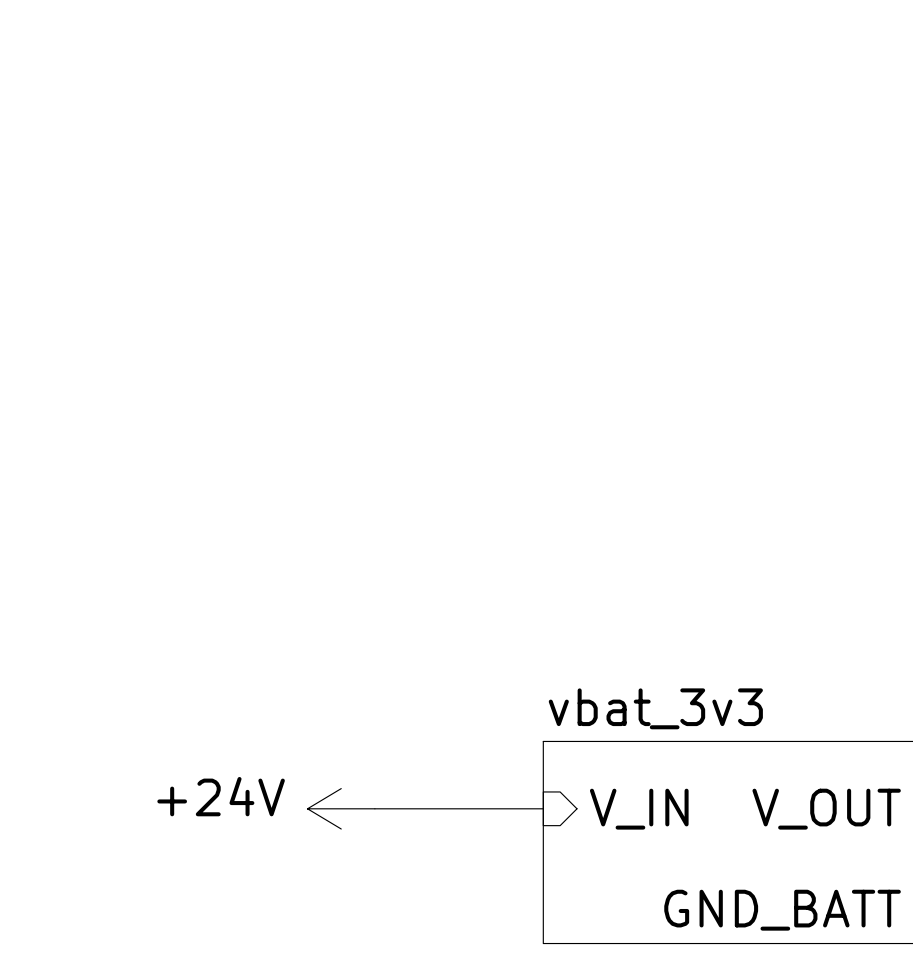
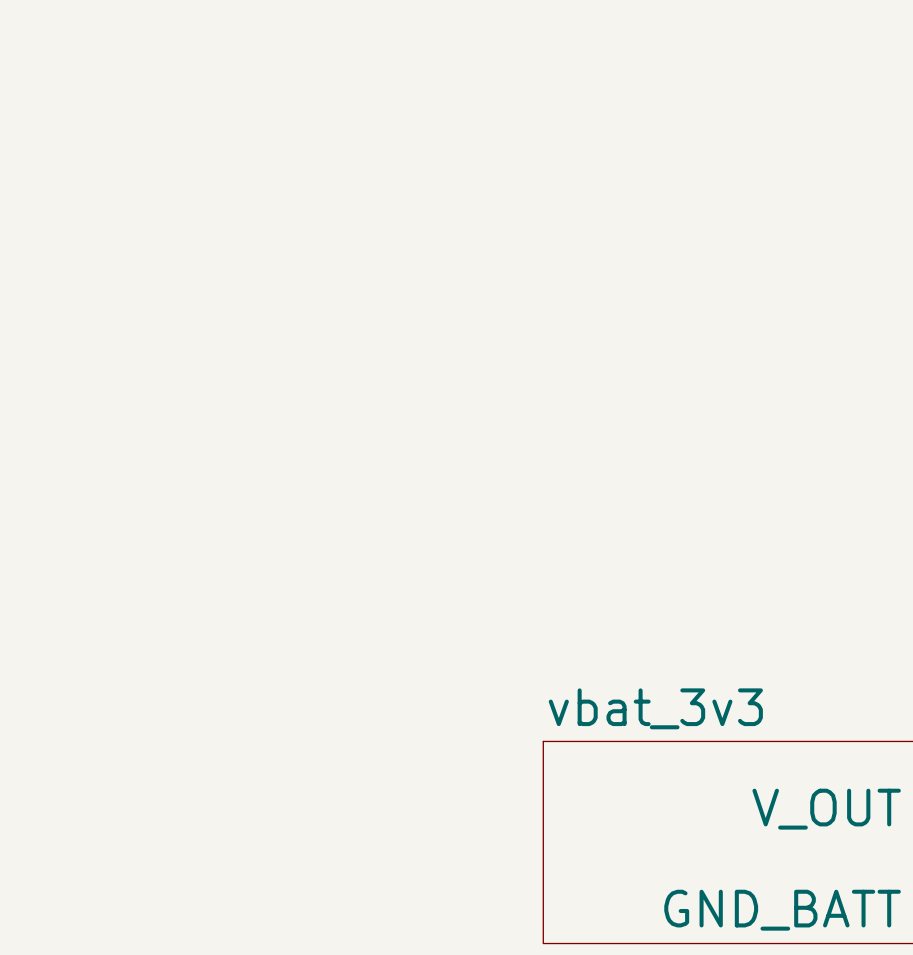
power symbol: +24V (341, 808) -> none
wire: (374, 808) (543, 808) -> none
sheet pin: V_IN (639, 809) -> none

